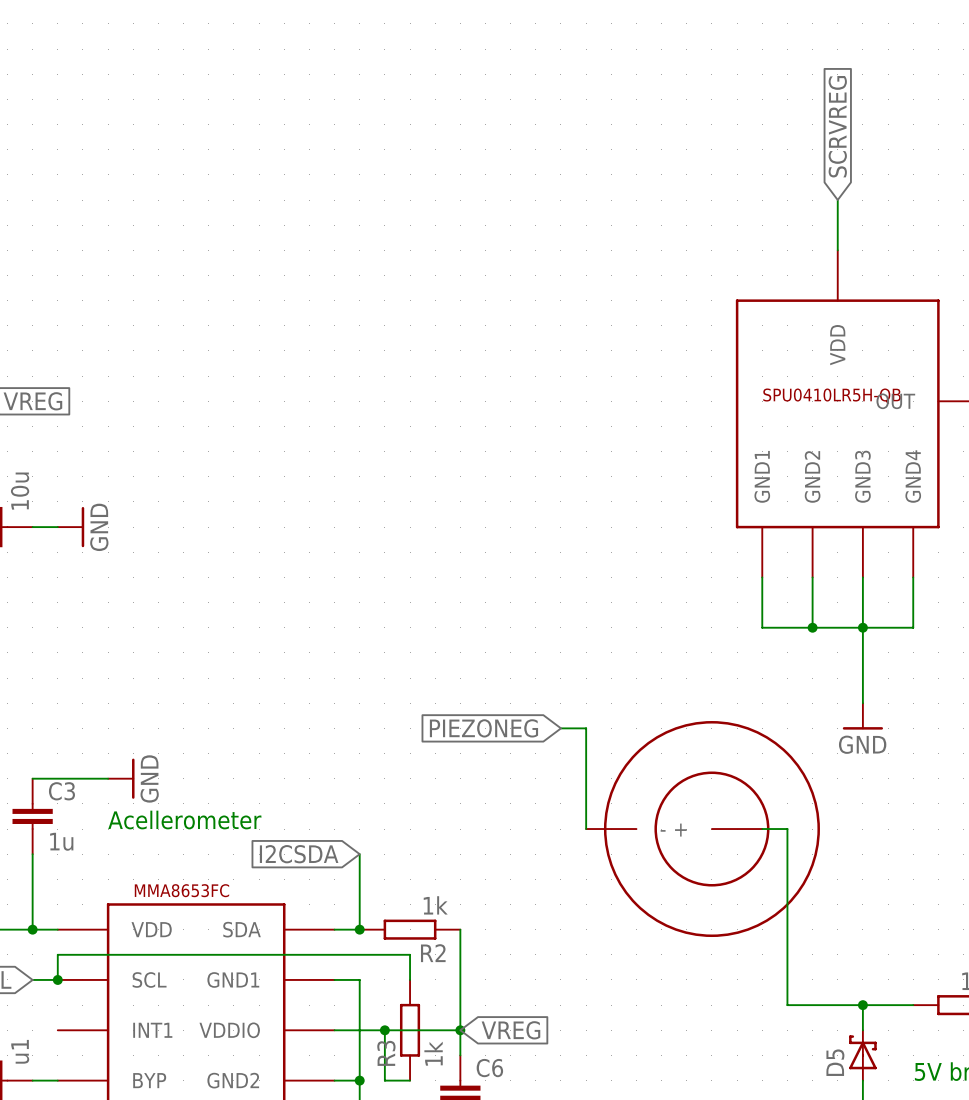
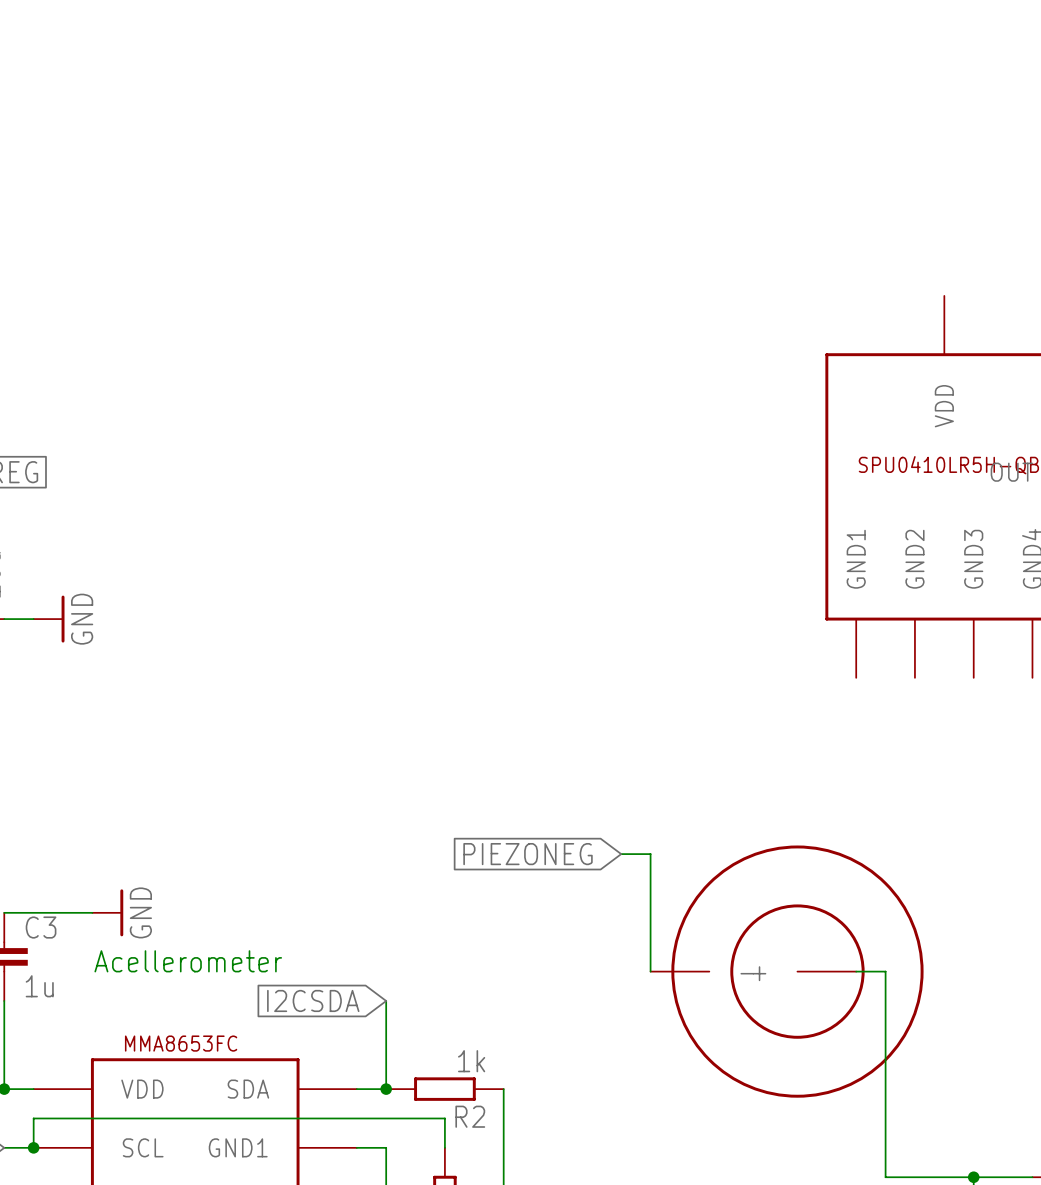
global label: SCRVREG (837, 126) -> none
wire: (837, 200) (837, 250) -> none
wire: (762, 577) (762, 627) (913, 627) (913, 577) -> none
wire: (812, 577) (812, 627) -> none
wire: (862, 577) (862, 703) -> none
junction: (812, 627) -> none
junction: (862, 627) -> none
power symbol: GND (862, 716) -> none

